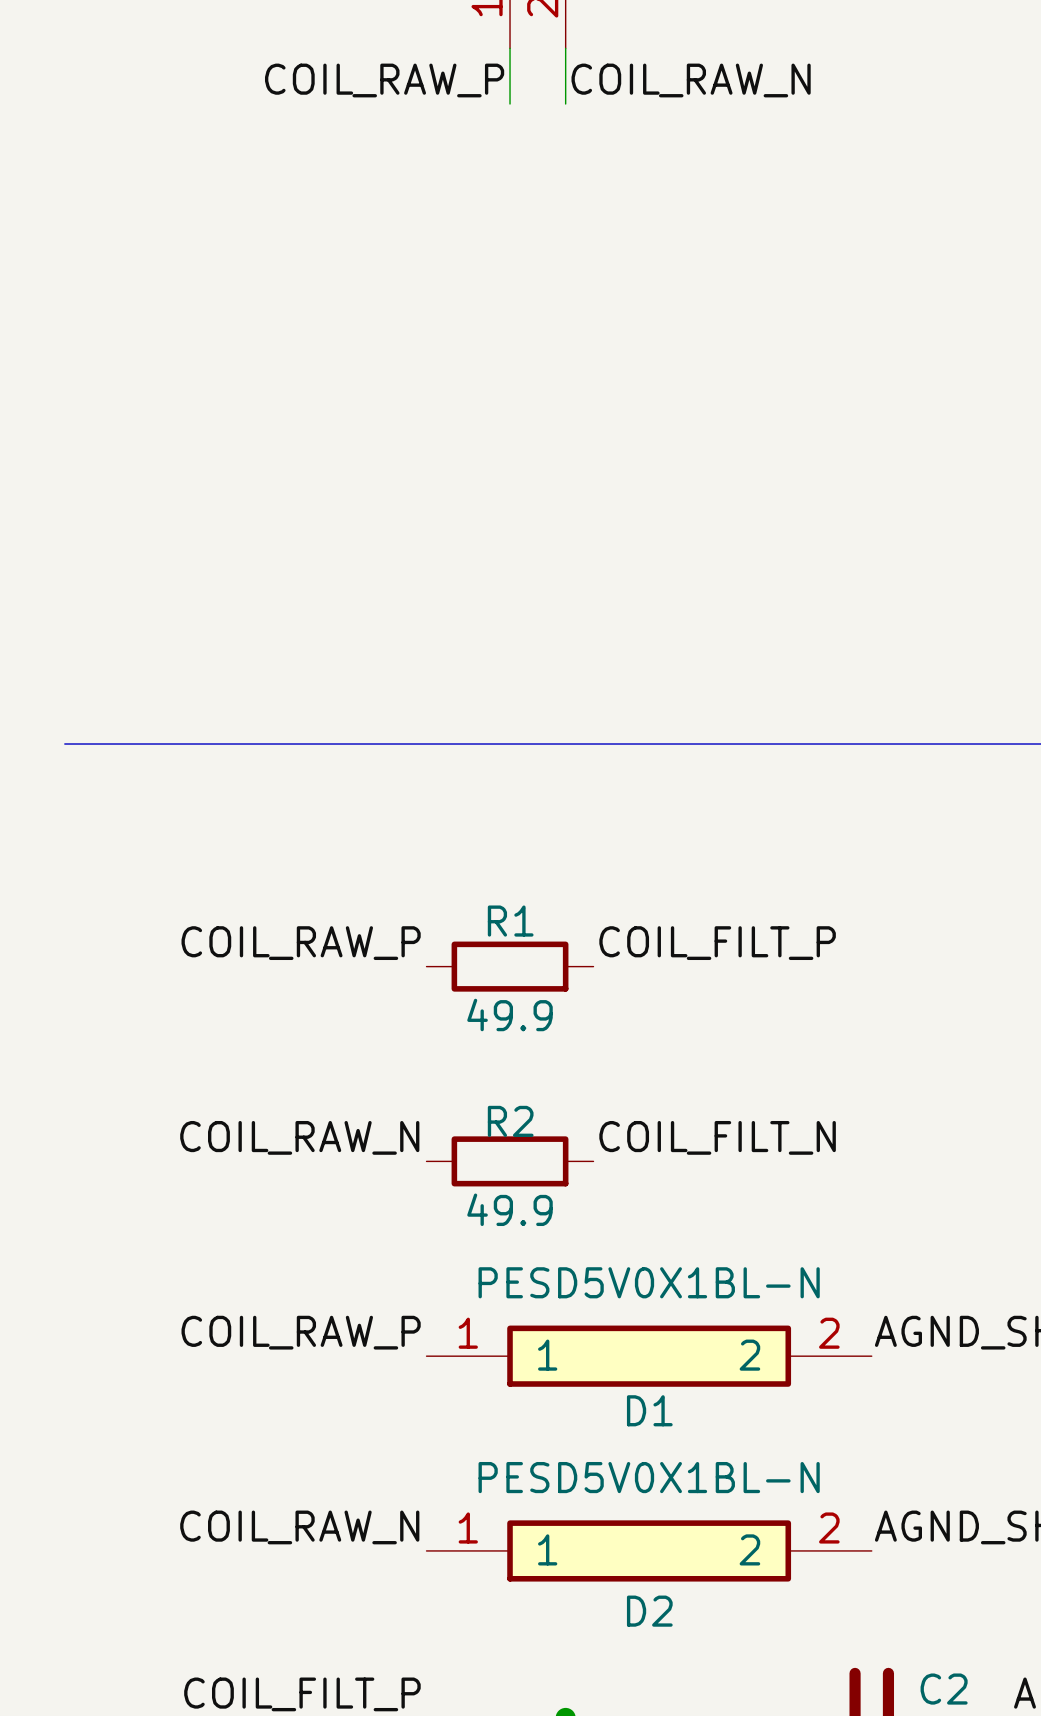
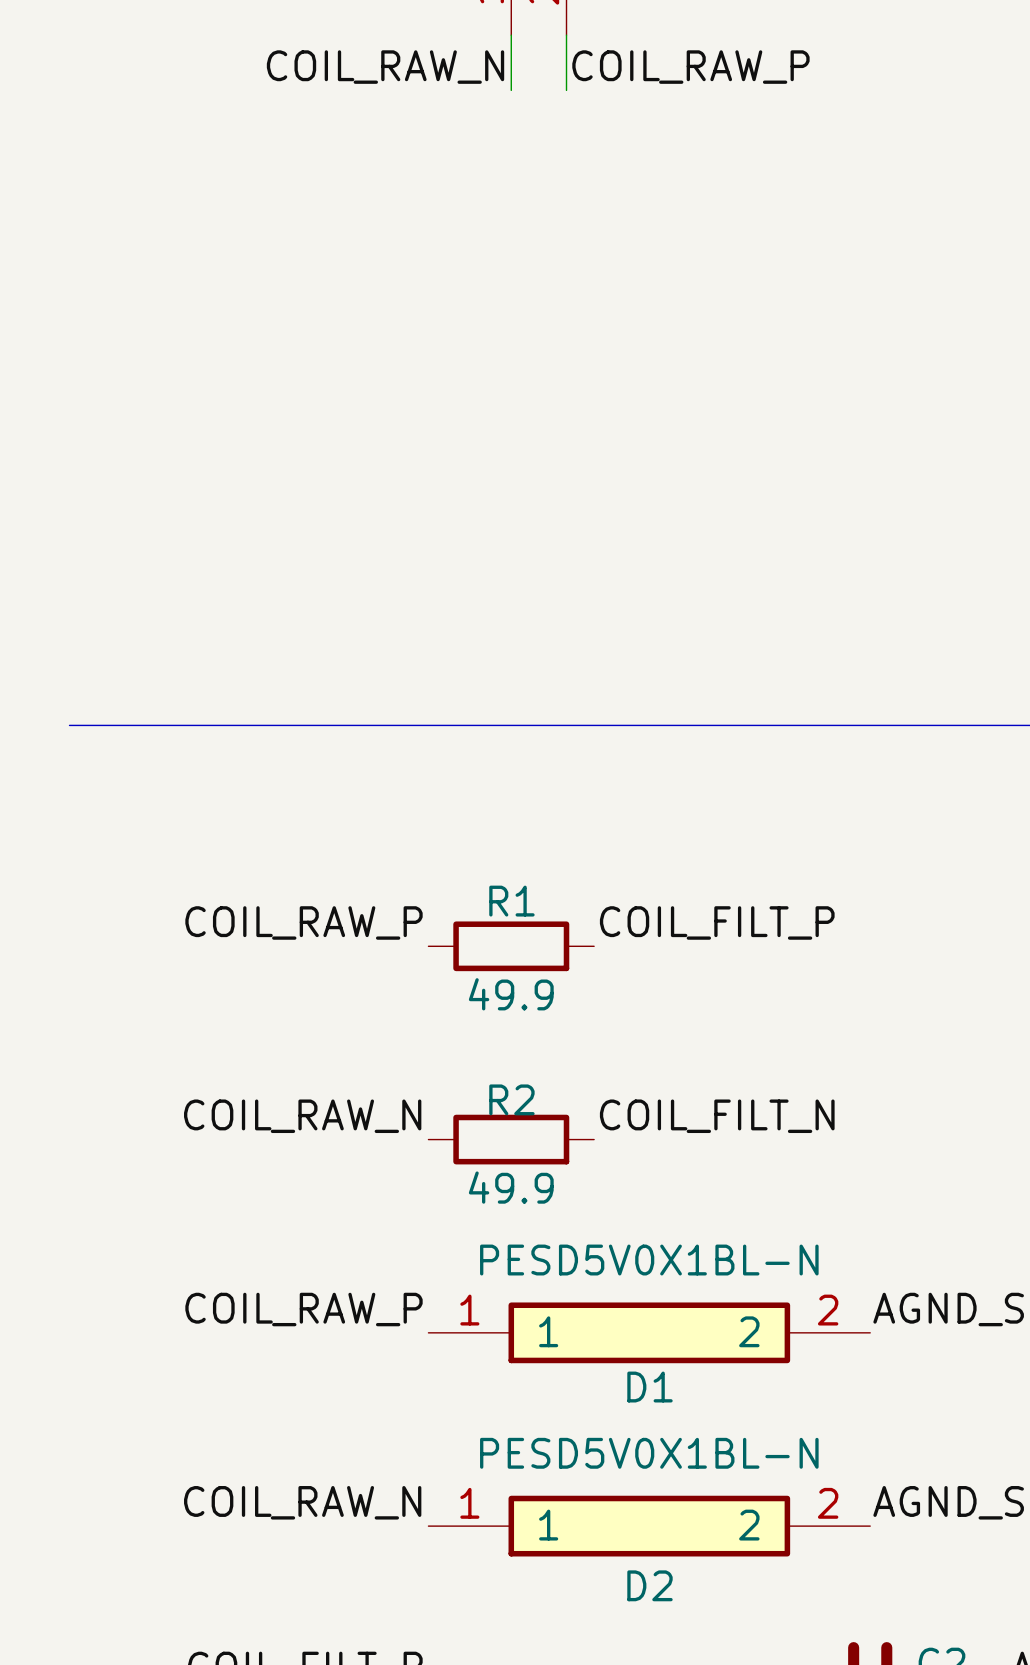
label: COIL_RAW_P (384, 80) -> COIL_RAW_N (385, 67)
label: COIL_RAW_N (691, 80) -> COIL_RAW_P (690, 67)

